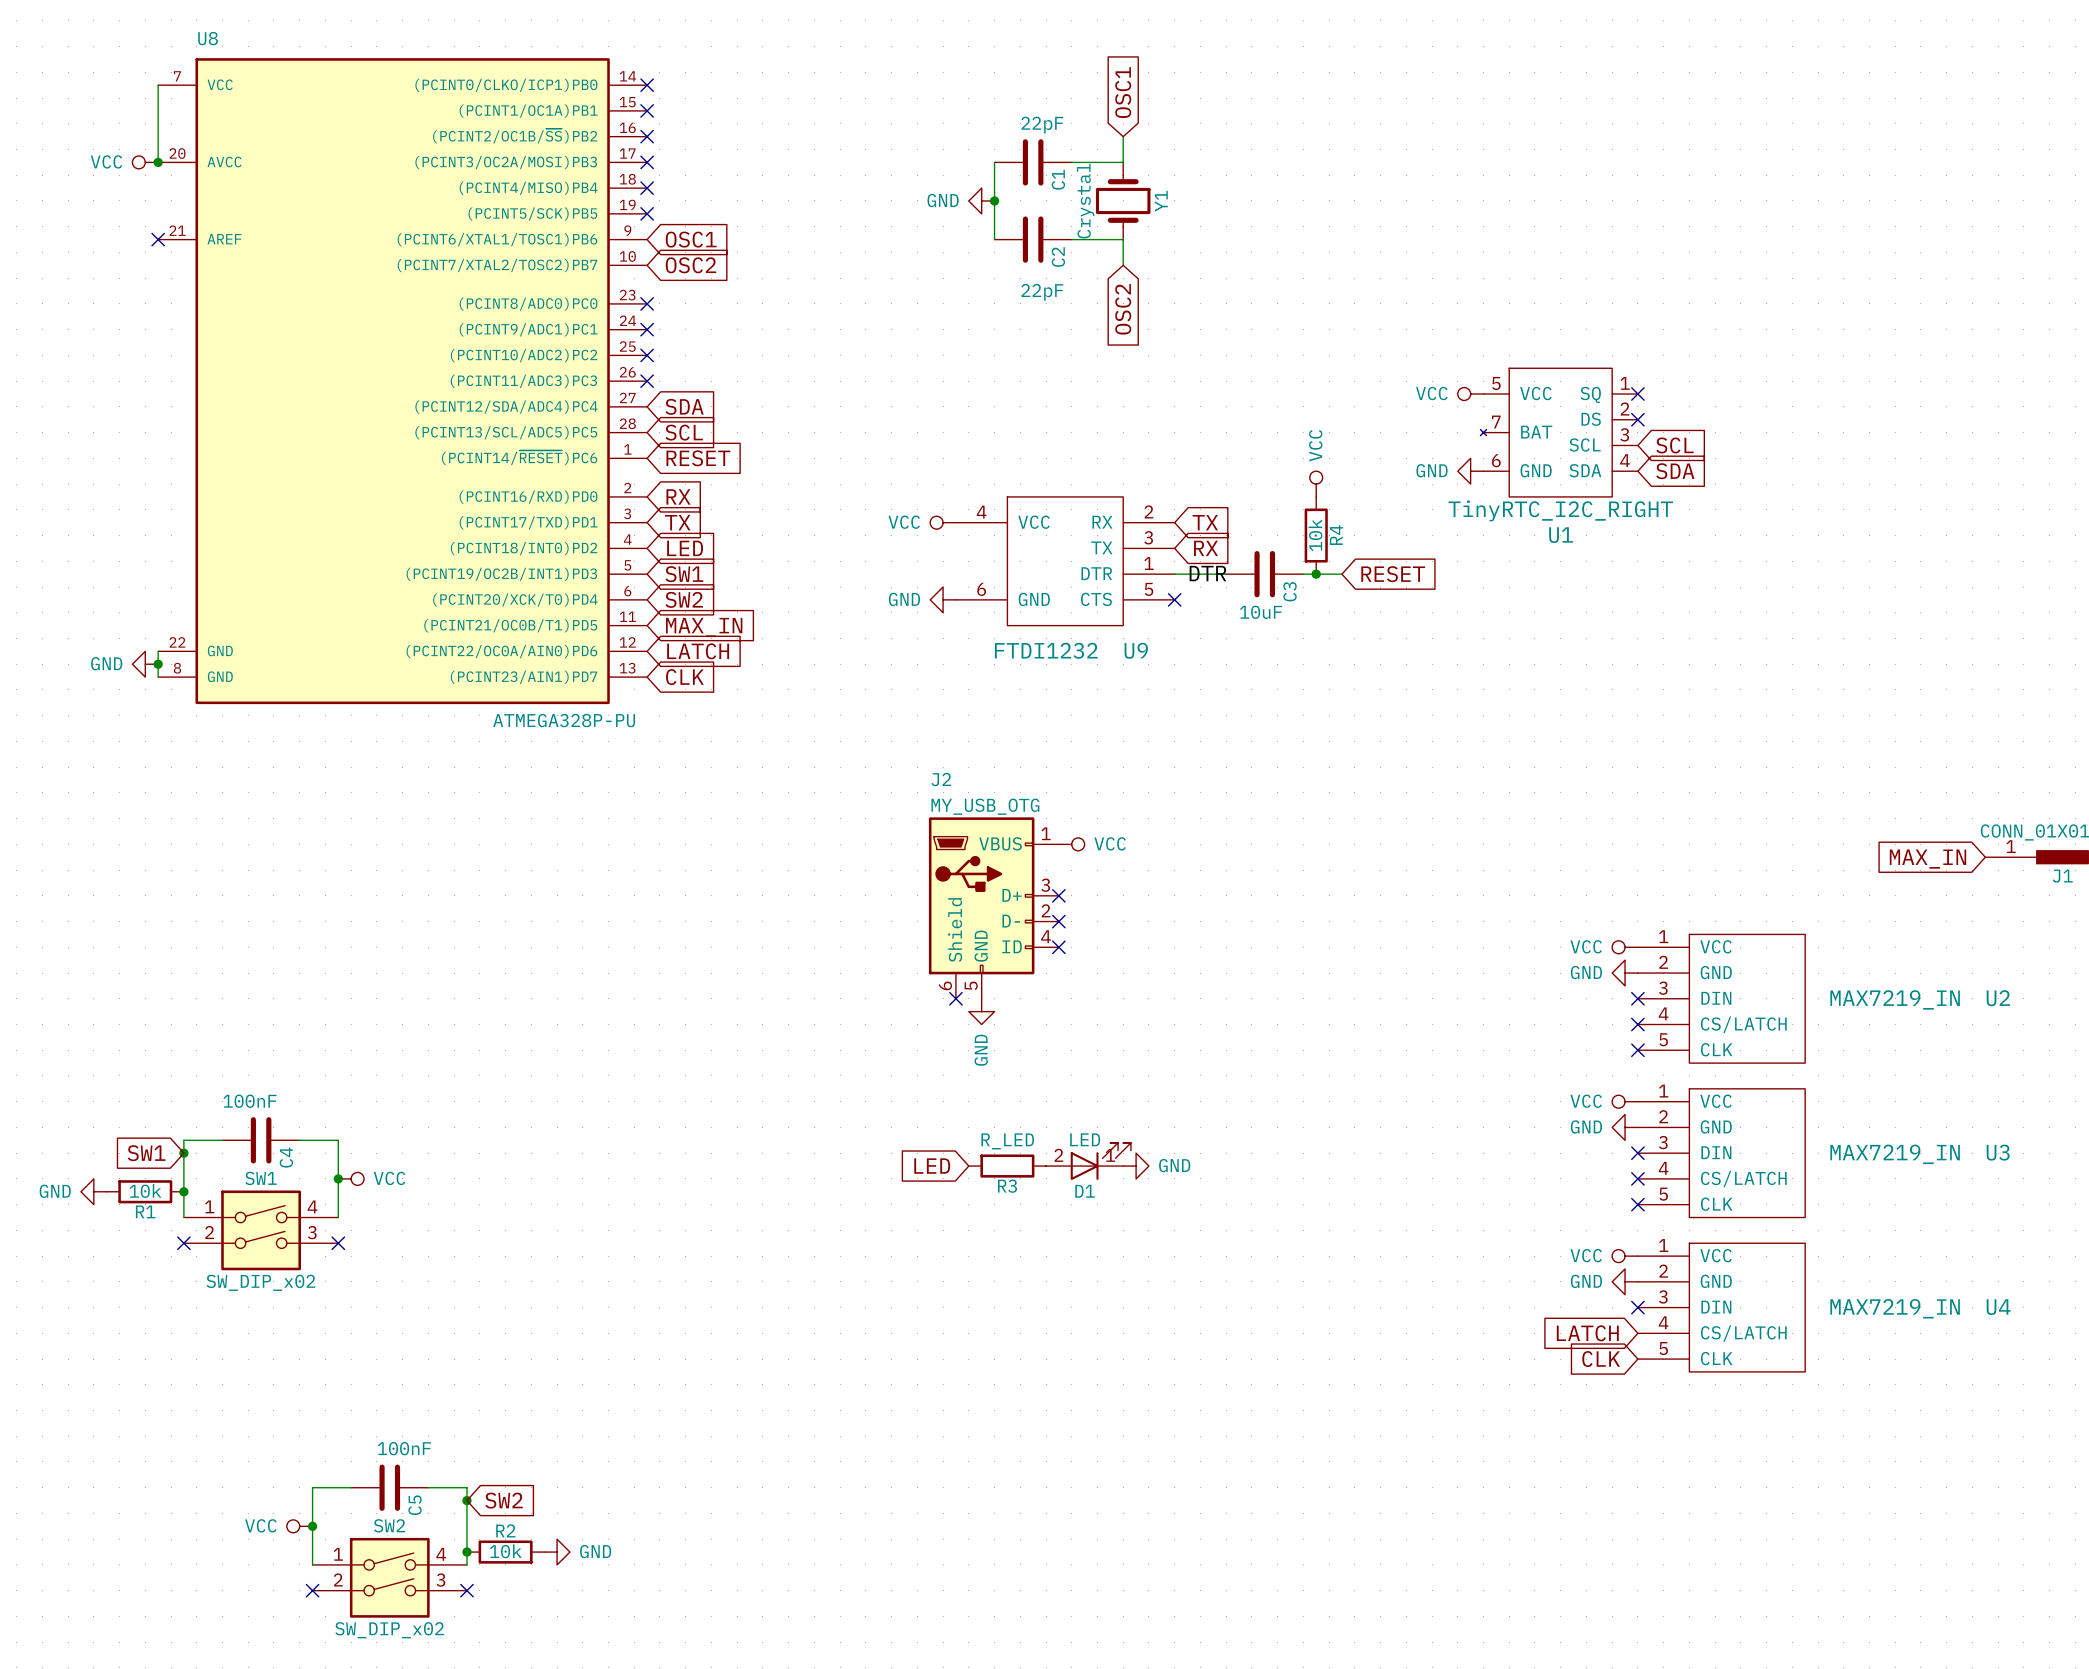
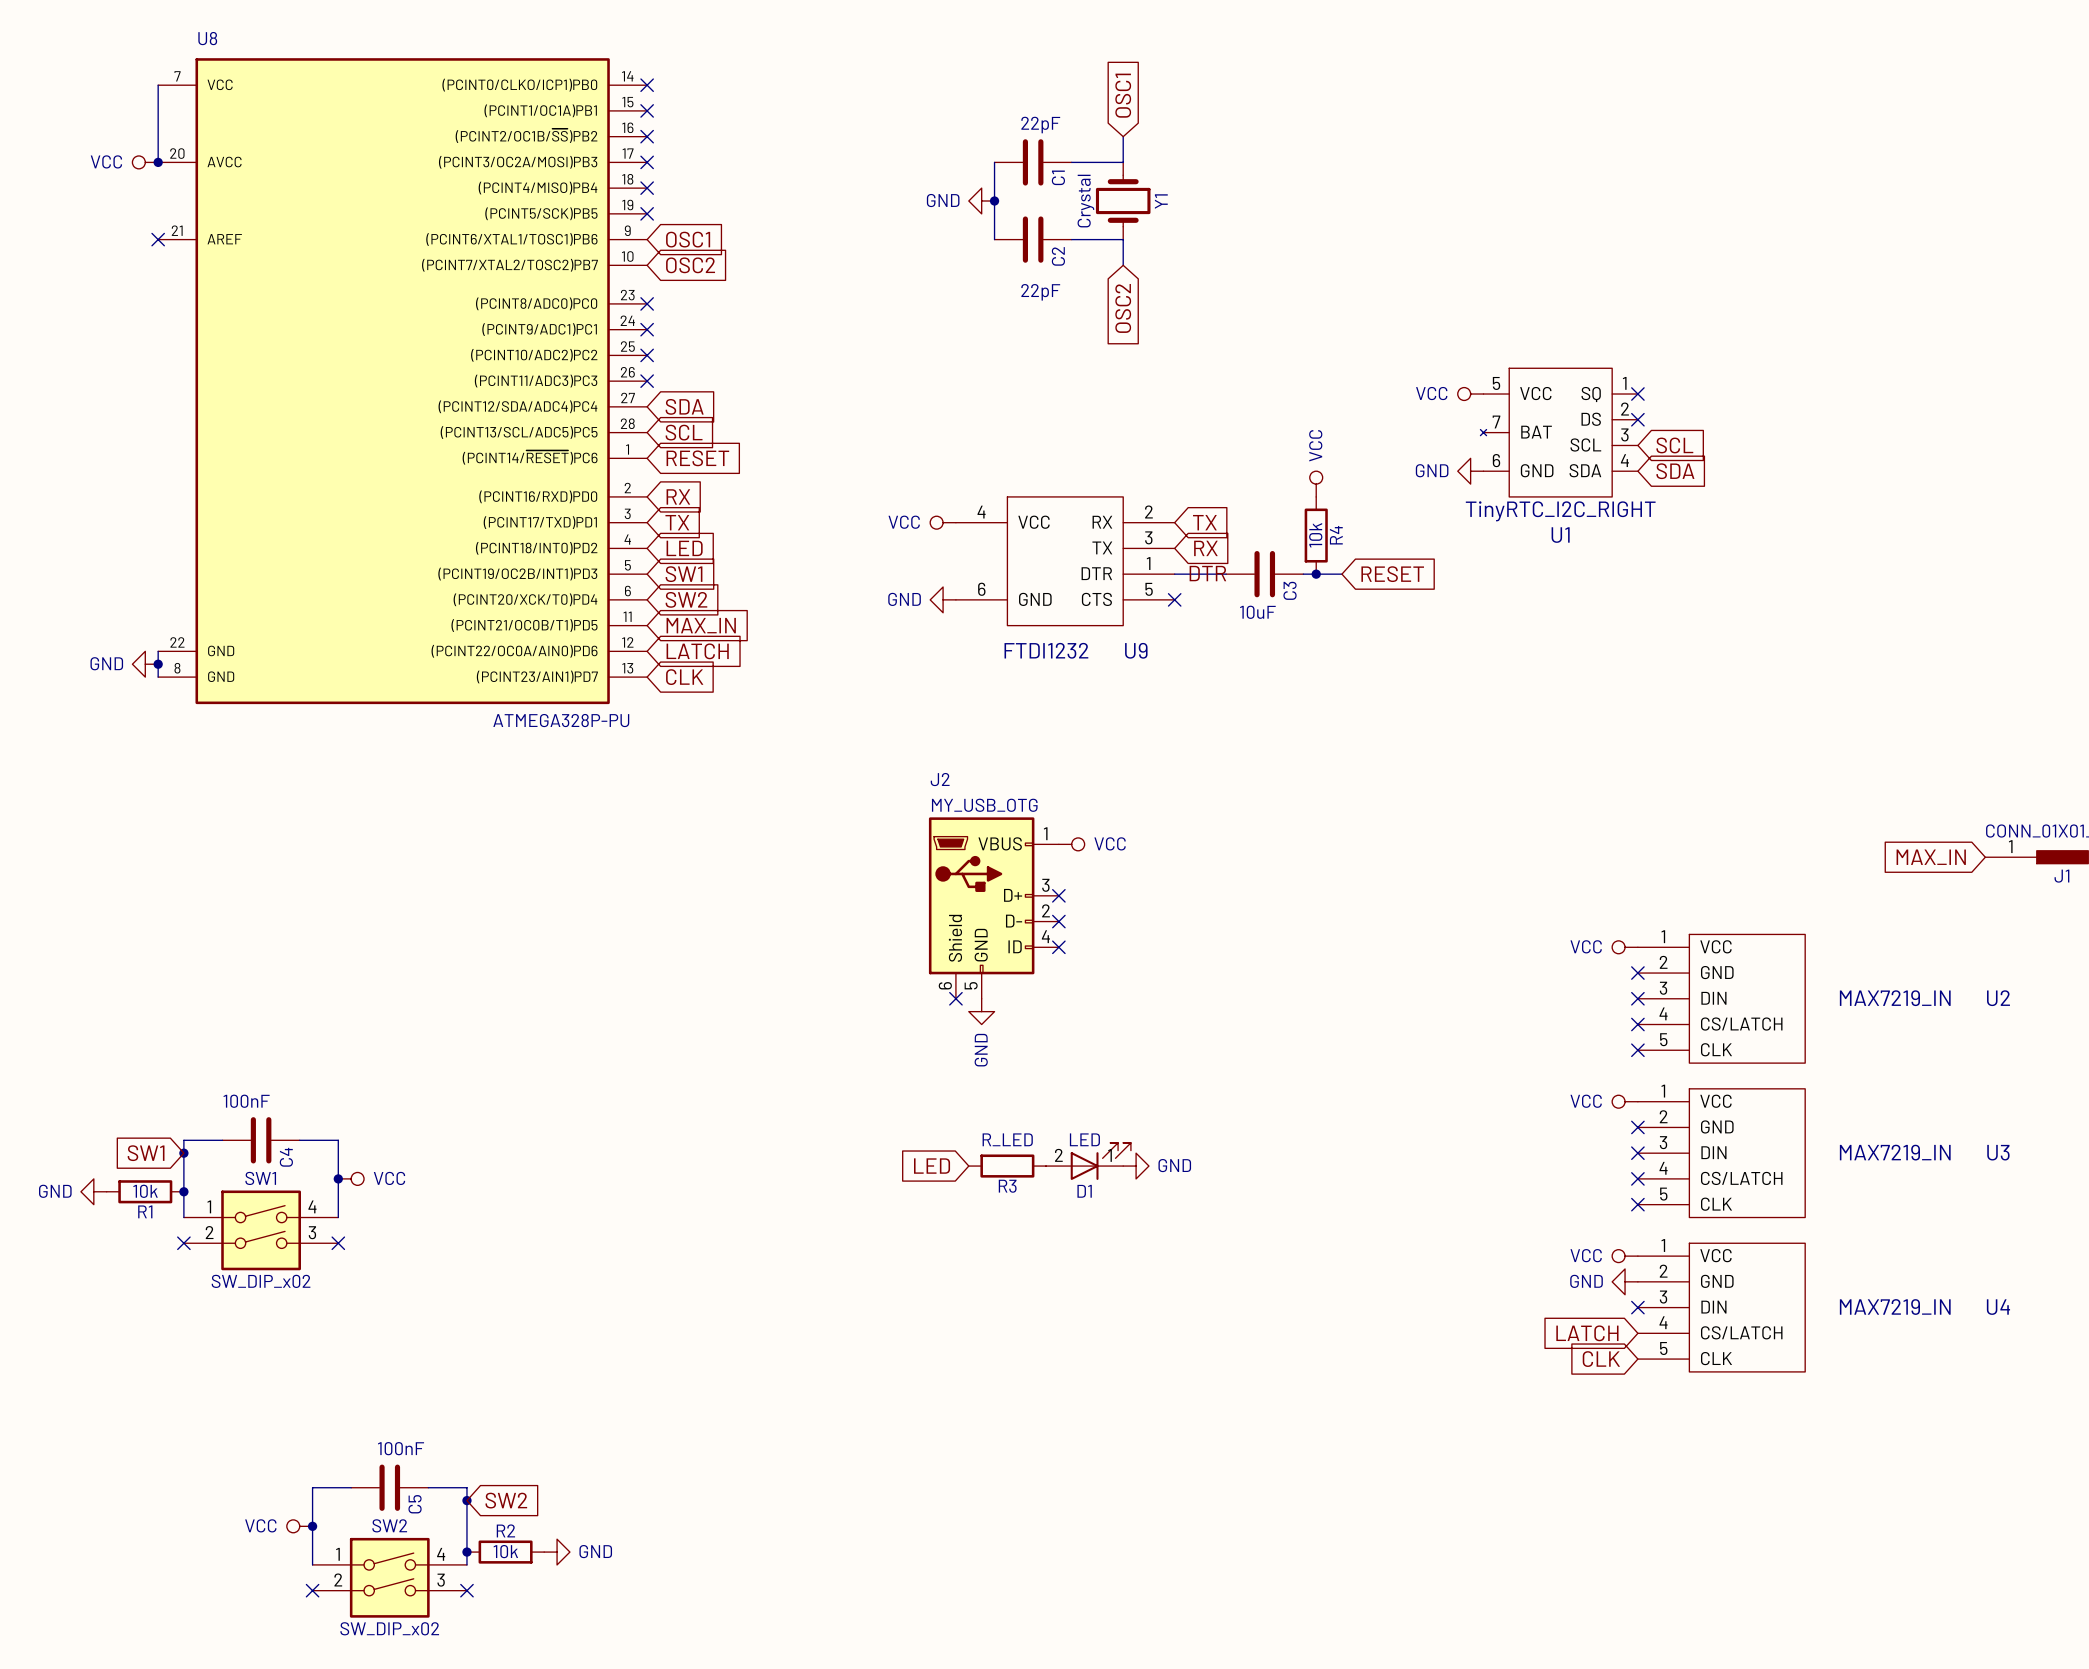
power symbol: GND (1625, 973) -> none
no-connect mark: none -> (1637, 973)
power symbol: GND (1625, 1127) -> none
no-connect mark: none -> (1637, 1127)

